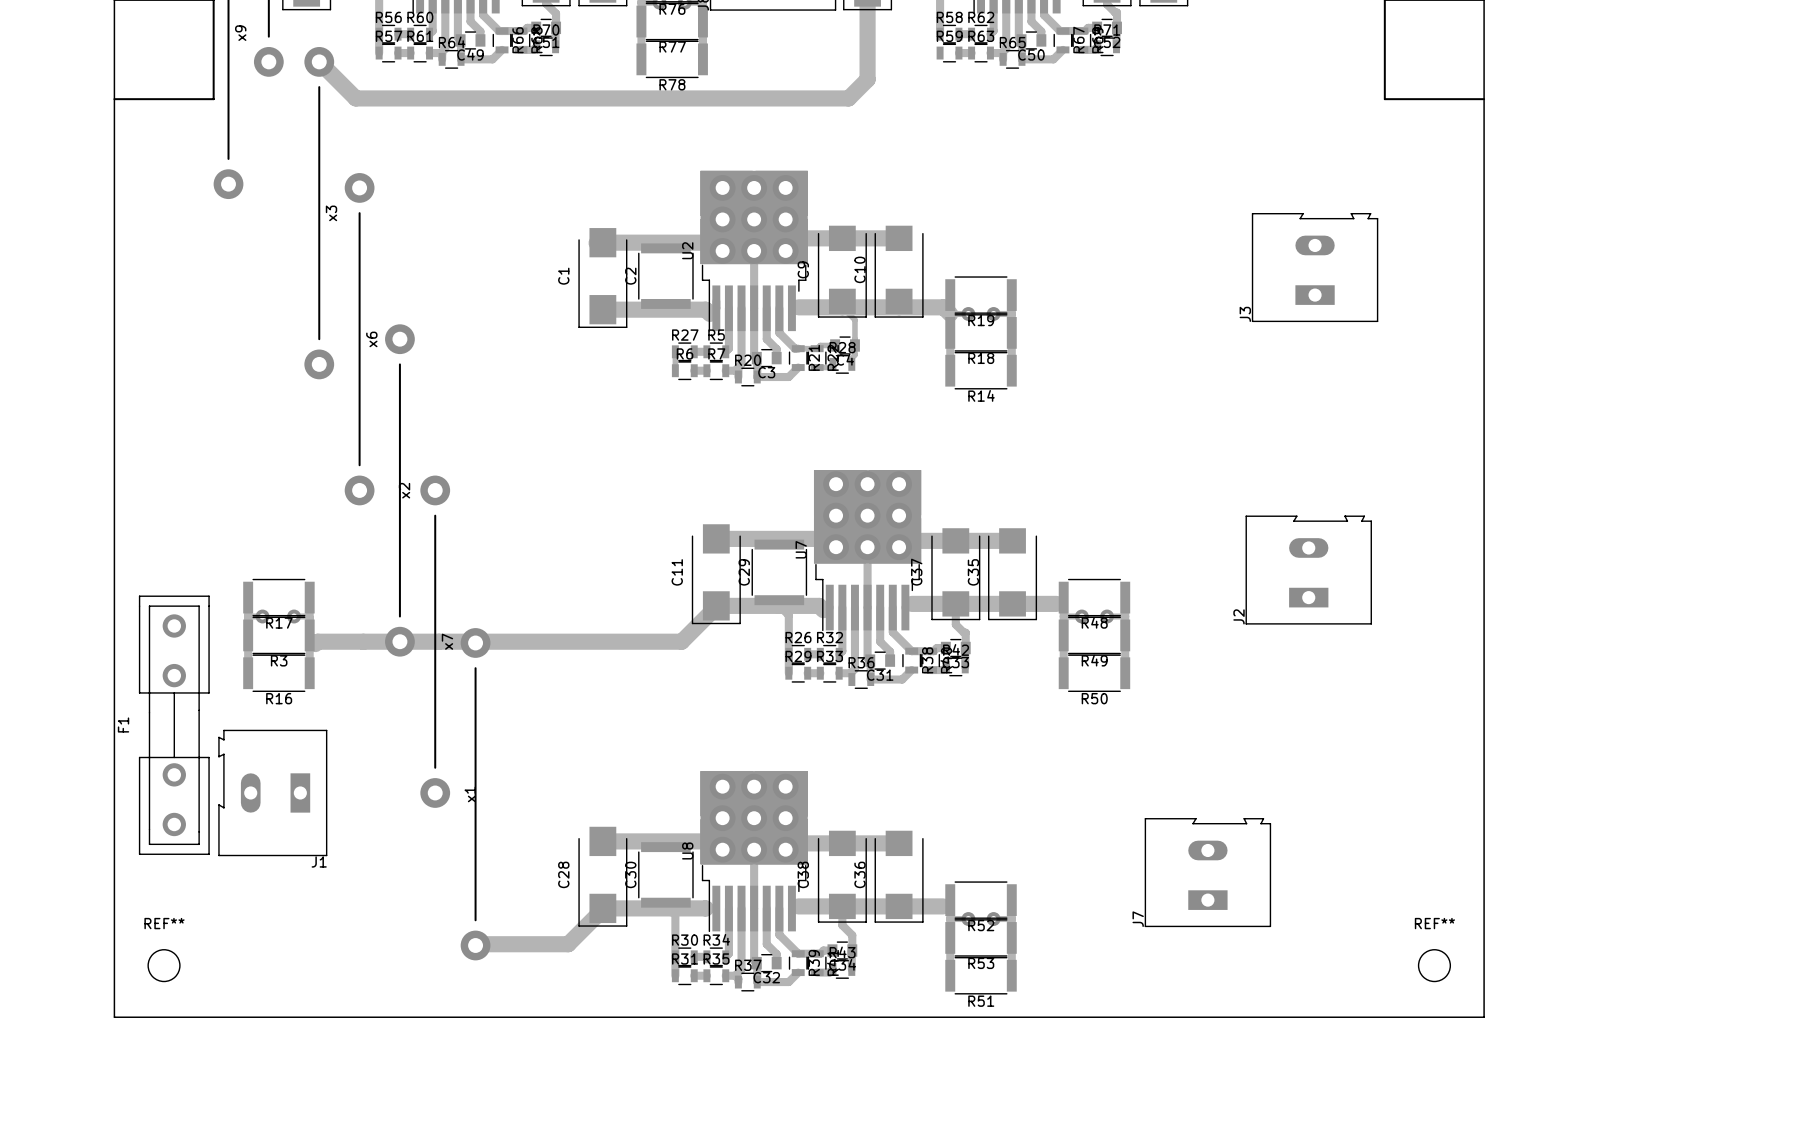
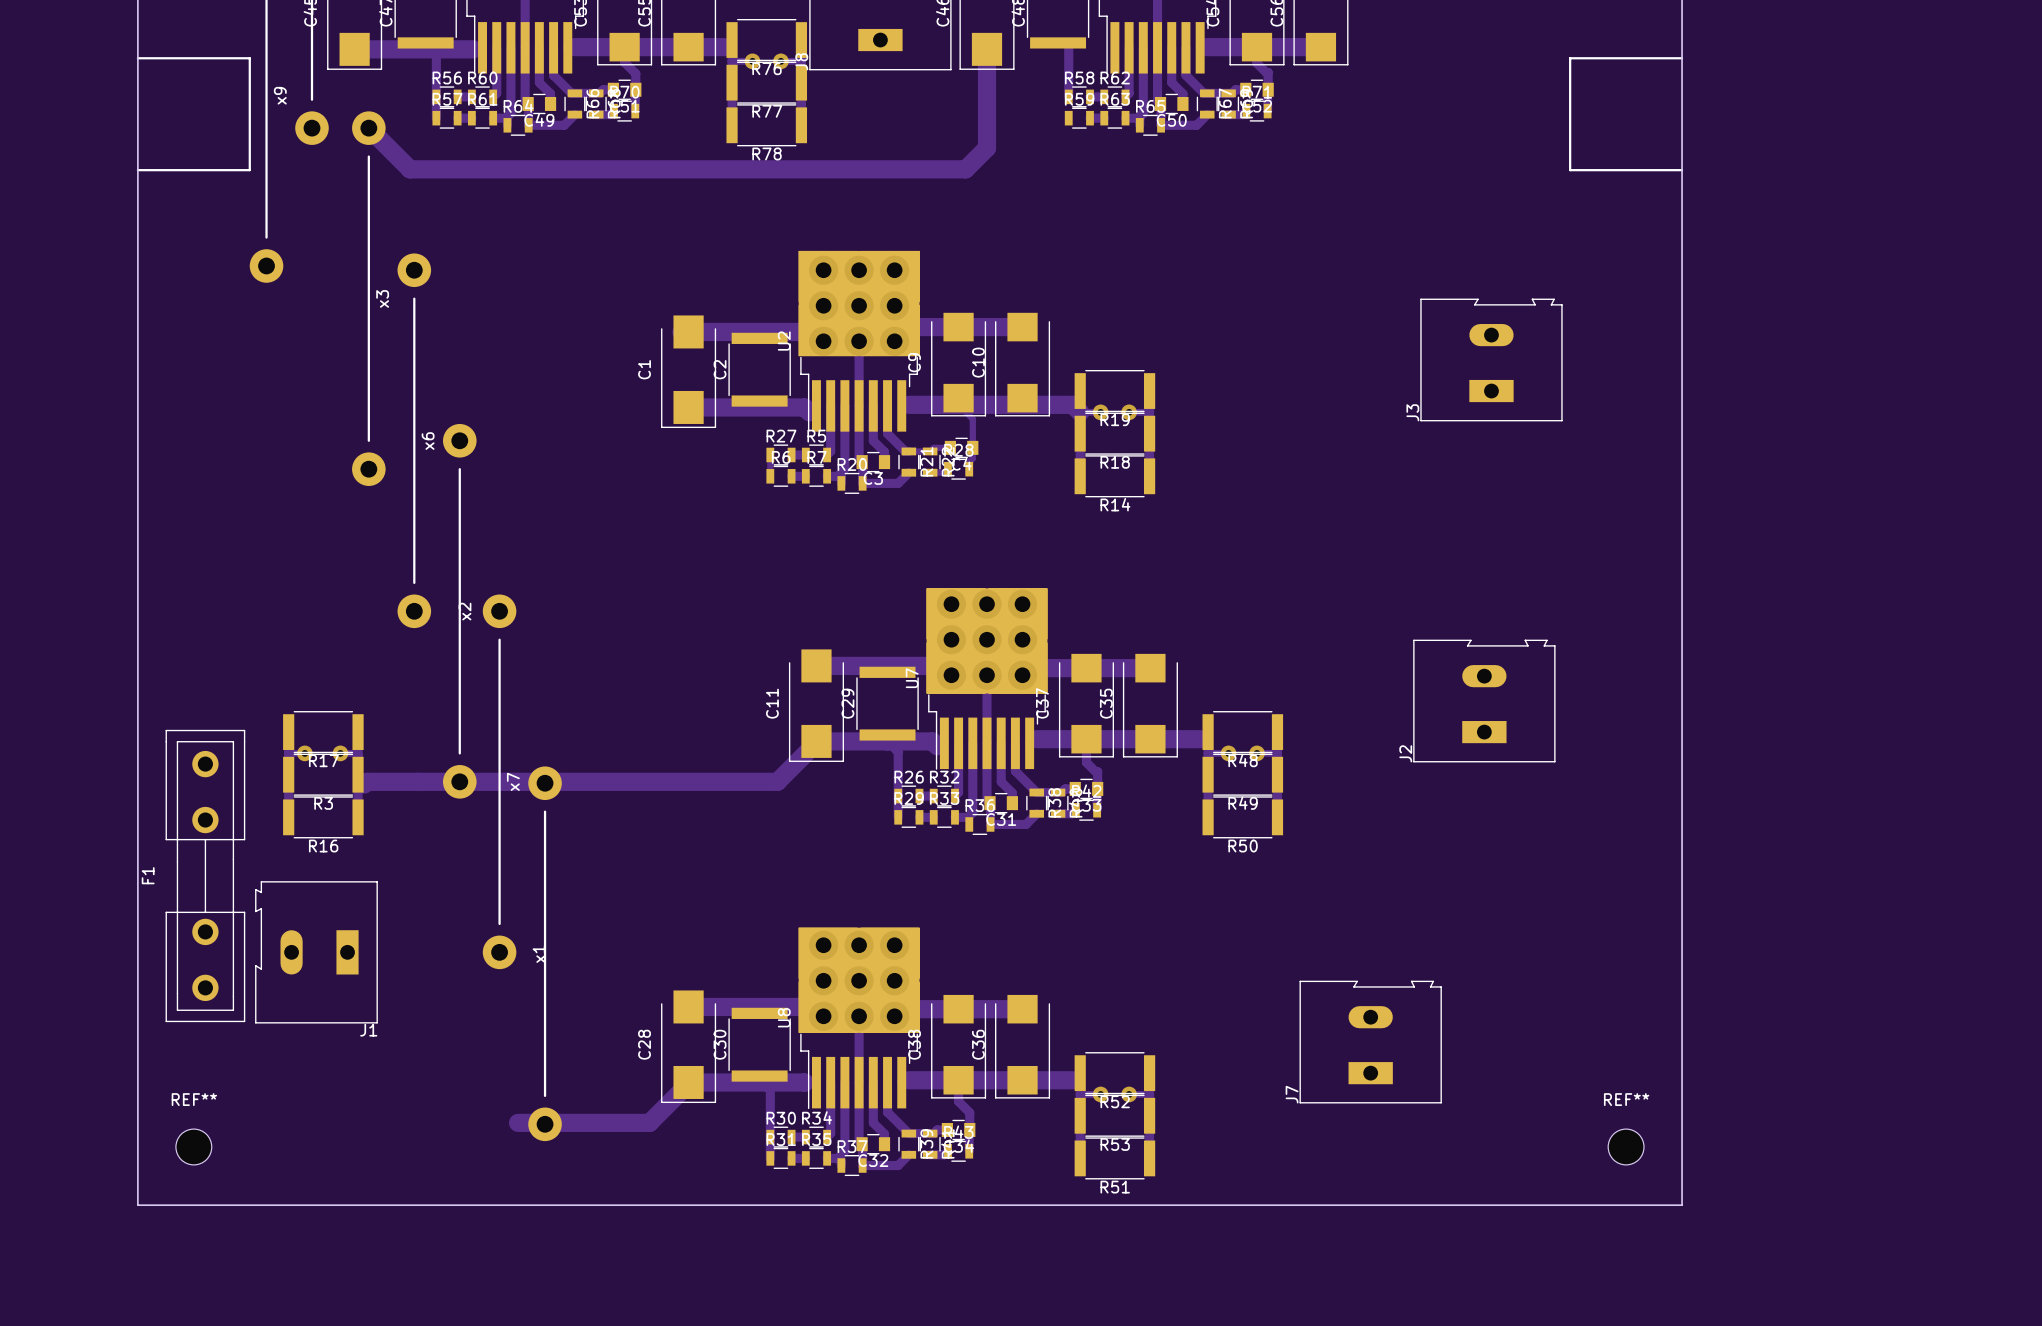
track: none -> (518, 1122) (546, 1122)

